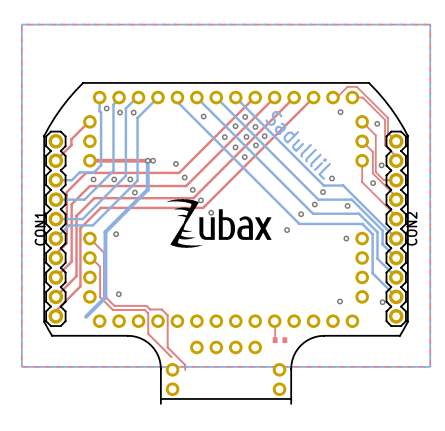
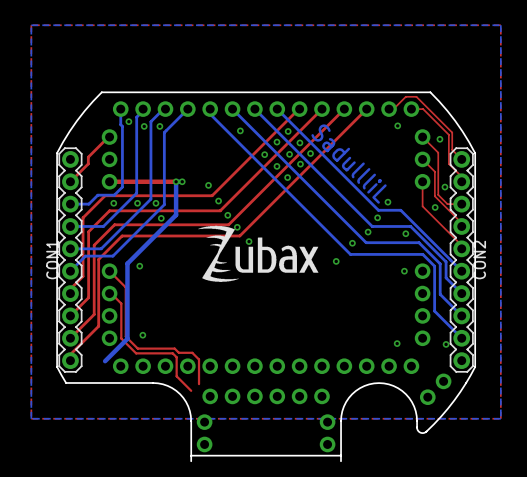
top track: (274, 321) (275, 340) -> none
board edge: (407, 321) (399, 335) (324, 335) (311, 338) (300, 345) (295, 352) (291, 368) -> (475, 366) (454, 400) (424, 432) (420, 432) (417, 429) (415, 411) (409, 397) (398, 388) (384, 383) (364, 385) (352, 394) (343, 406) (341, 421)
top track: (148, 329) (148, 333) (171, 357) -> (176, 376) (191, 390)
top track: (167, 336) (167, 347) (185, 364) (185, 369) -> none
part footprint: [190, 340, 263, 355] -> [202, 388, 330, 405]
part: (280, 340) -> none
part: none -> (435, 389)

